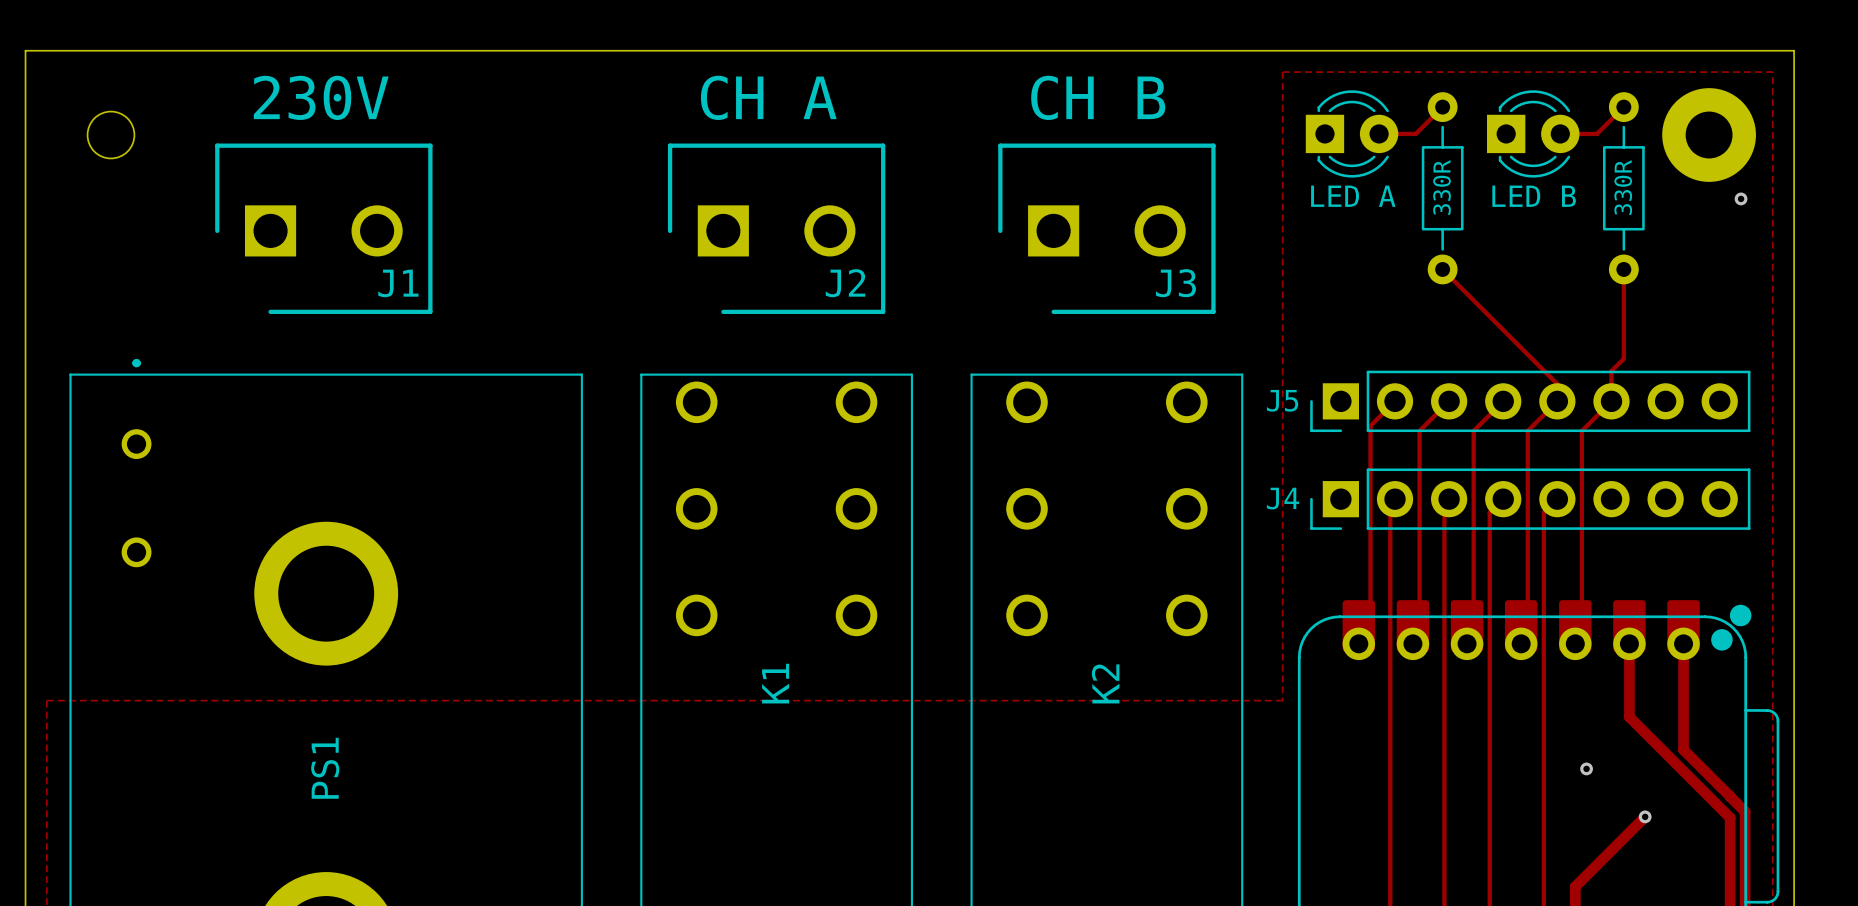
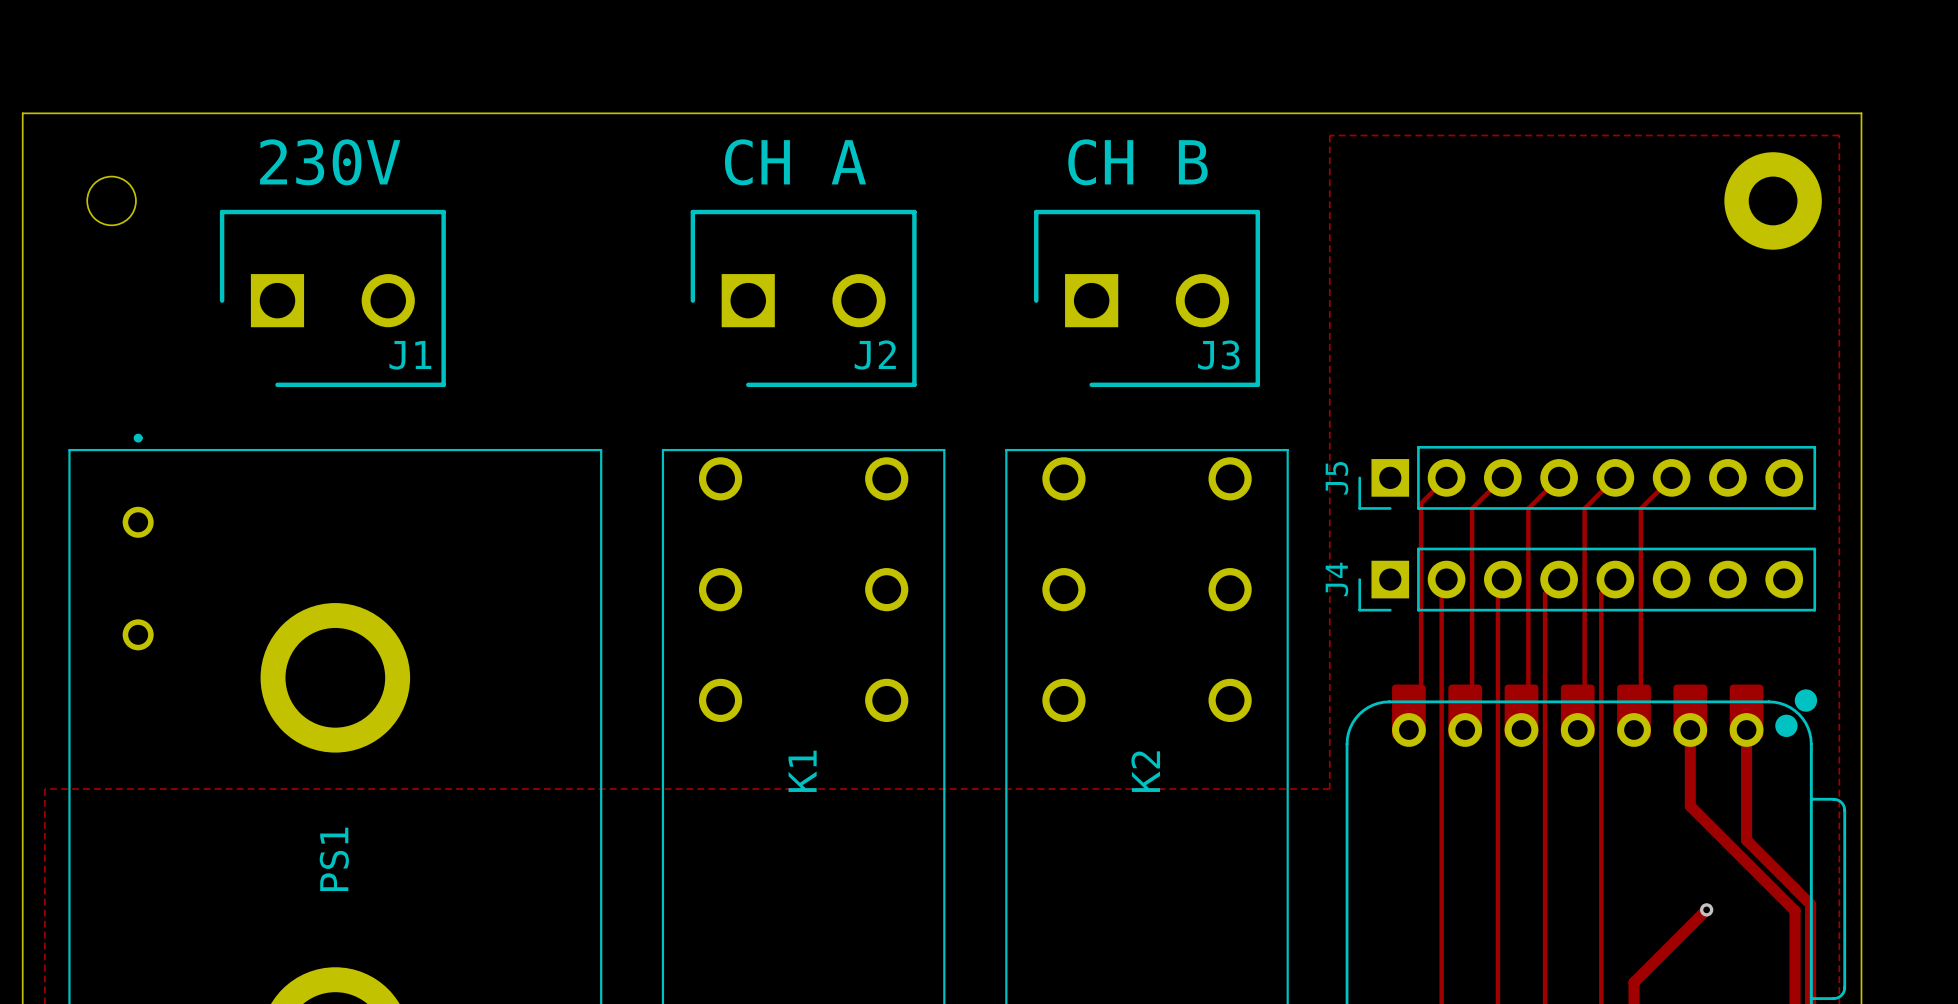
track: (1442, 107) (1415, 133) (1379, 133) -> none
track: (1623, 107) (1597, 133) (1560, 133) -> none
part: LED A (1352, 133) -> none
part: LED B (1533, 133) -> none
part: 330R (1442, 188) -> none
part: 330R (1623, 188) -> none
via: (1741, 198) -> none
track: (1442, 269) (1557, 384) (1557, 401) -> none
track: (1623, 269) (1623, 358) (1611, 371) (1611, 401) -> none
J5 name rotation: 0° (1282, 400) -> 90° counterclockwise (1336, 478)
J4 name rotation: 0° (1283, 498) -> 90° counterclockwise (1336, 579)
via: (1586, 768) -> none

